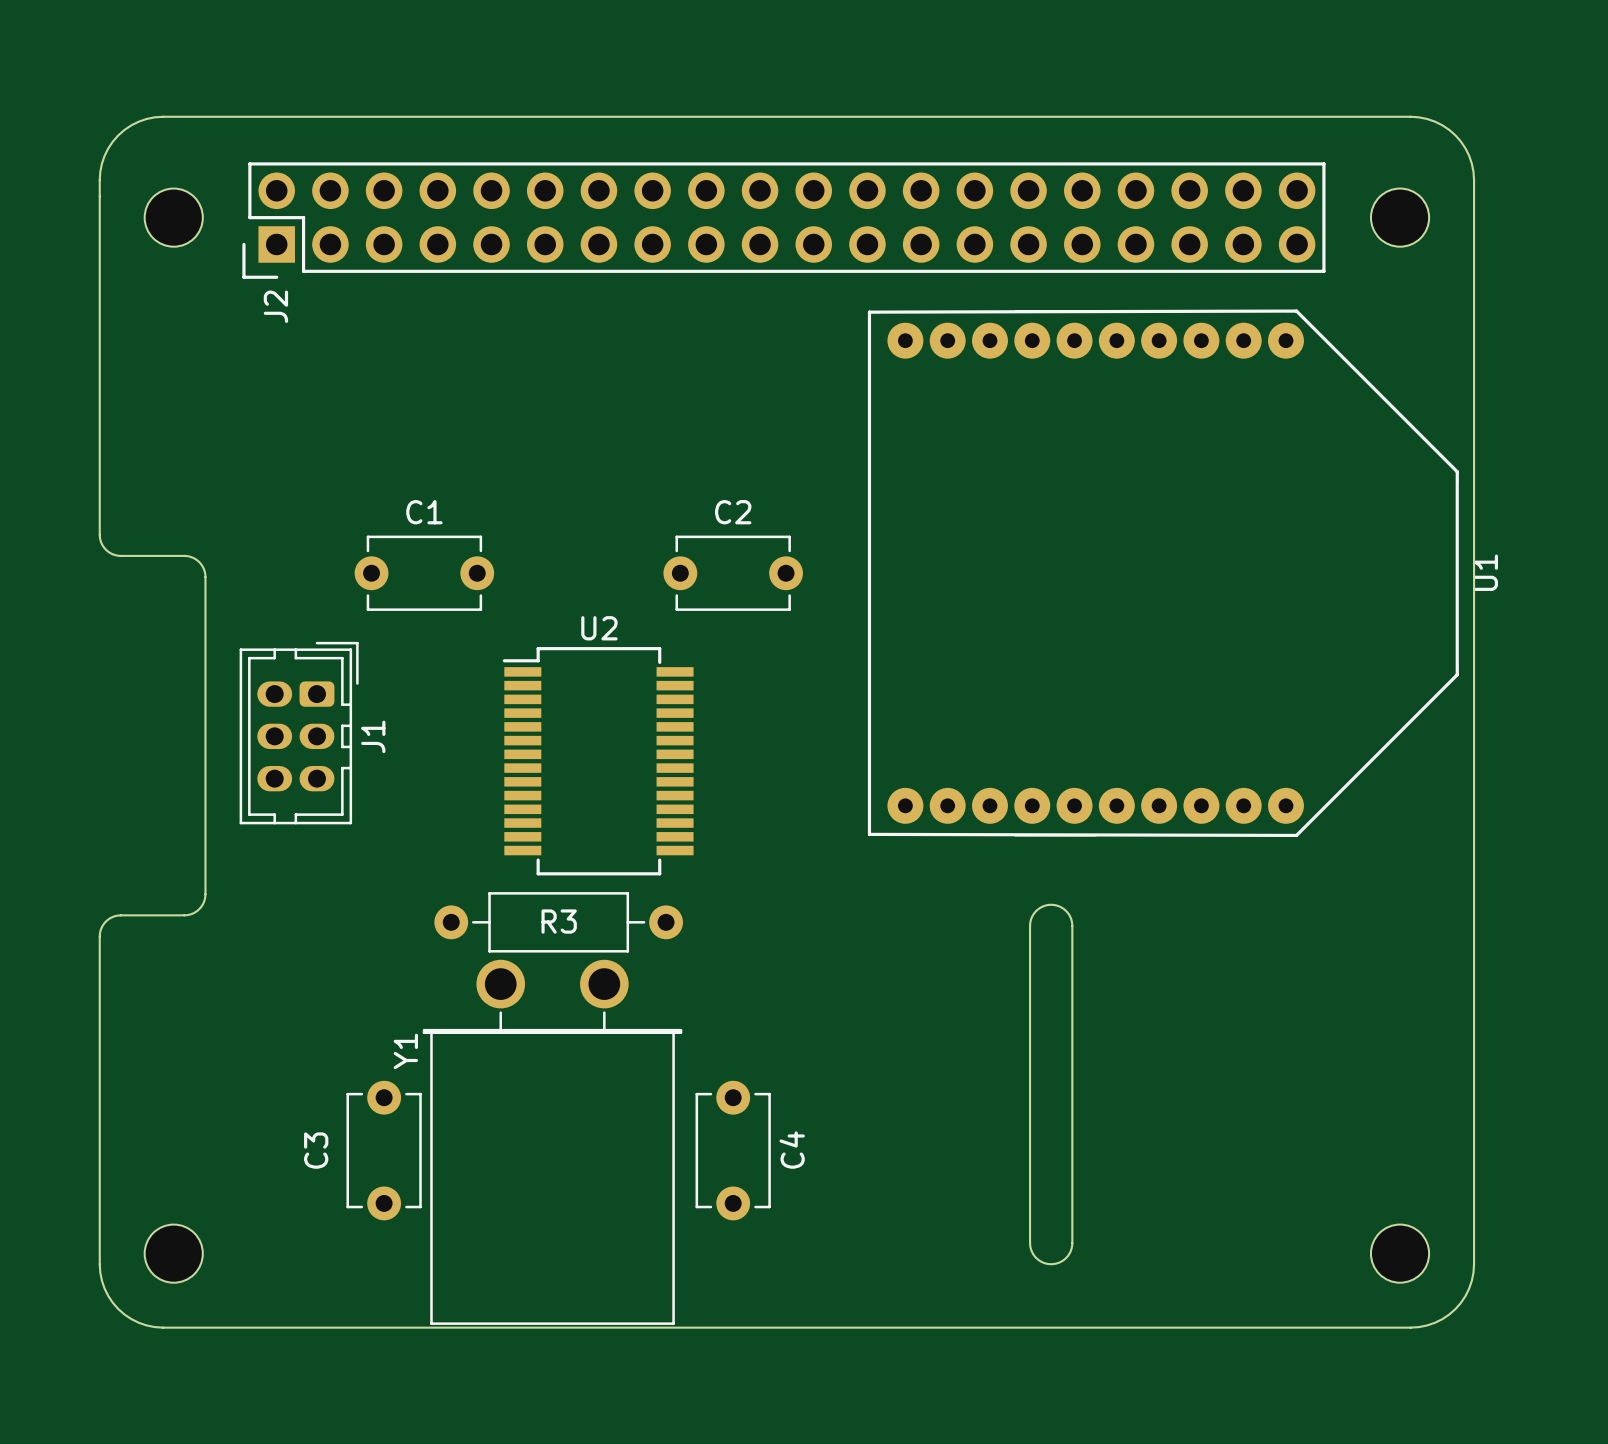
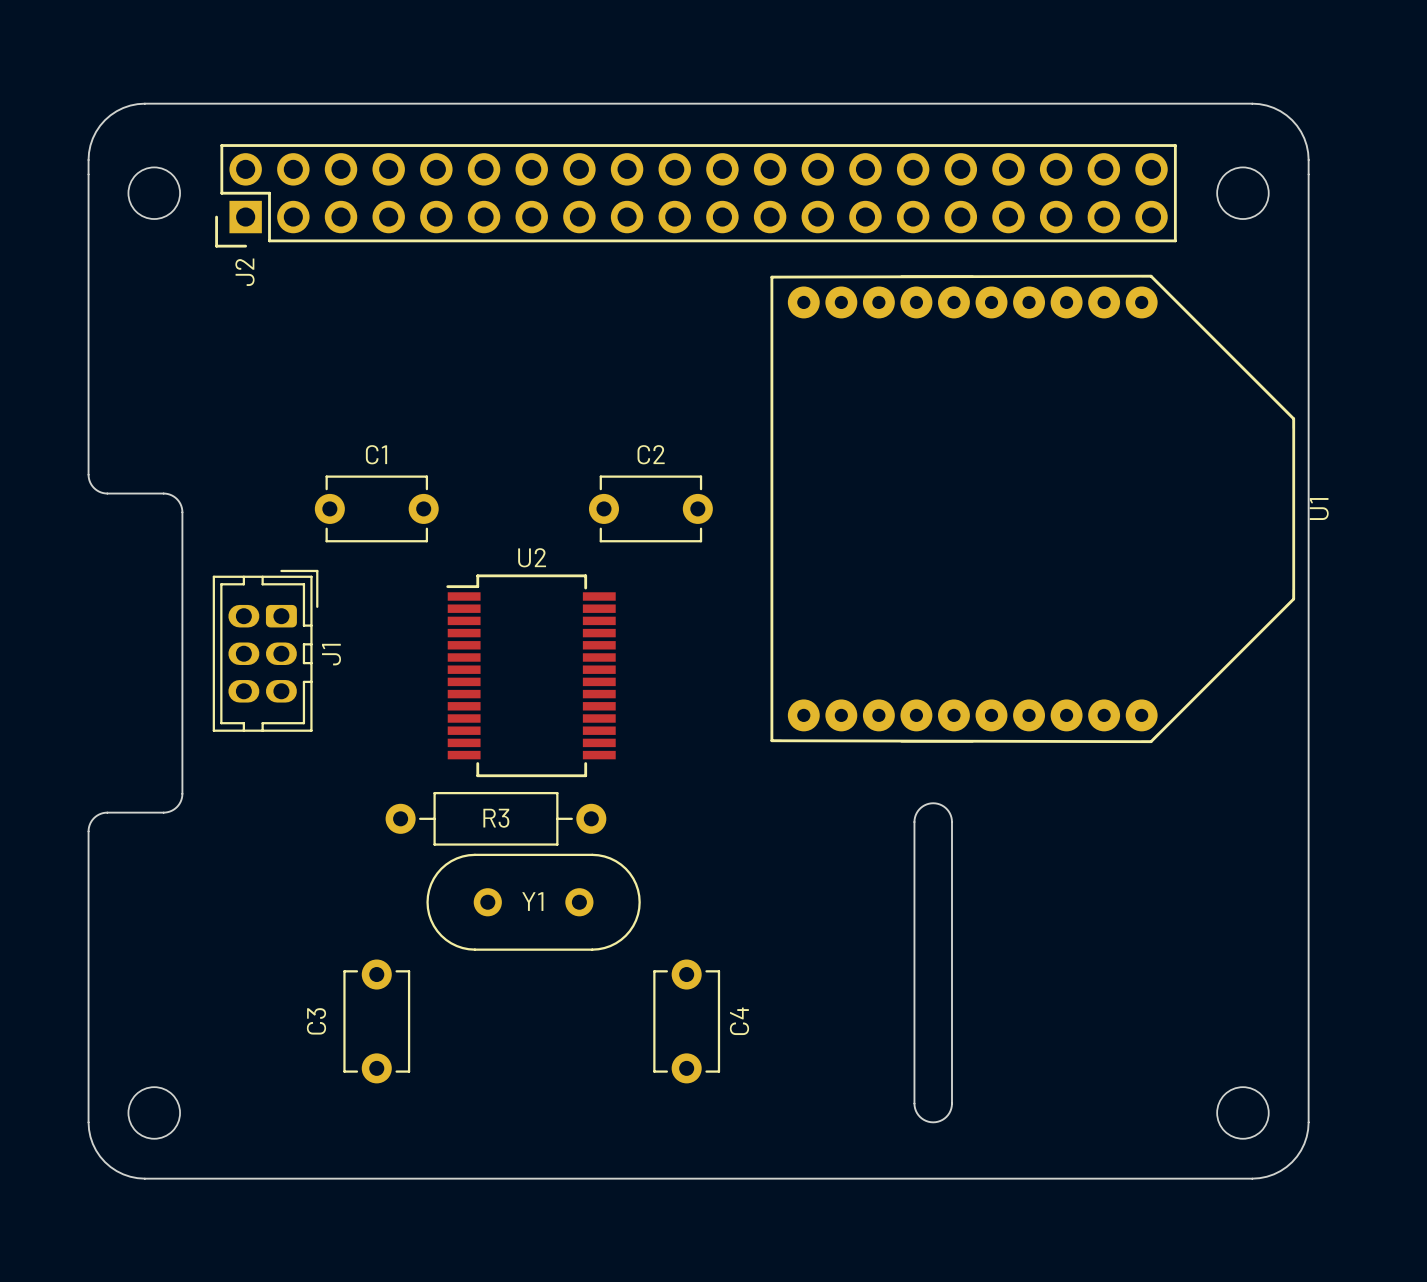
Y1 footprint: [422, 959, 683, 1325] -> [426, 853, 641, 951]
Y1 name position: Y1 (405, 1051) -> Y1 (532, 901)
C3 position: (384, 1150) -> (376, 1021)
C4 position: (733, 1150) -> (686, 1021)

